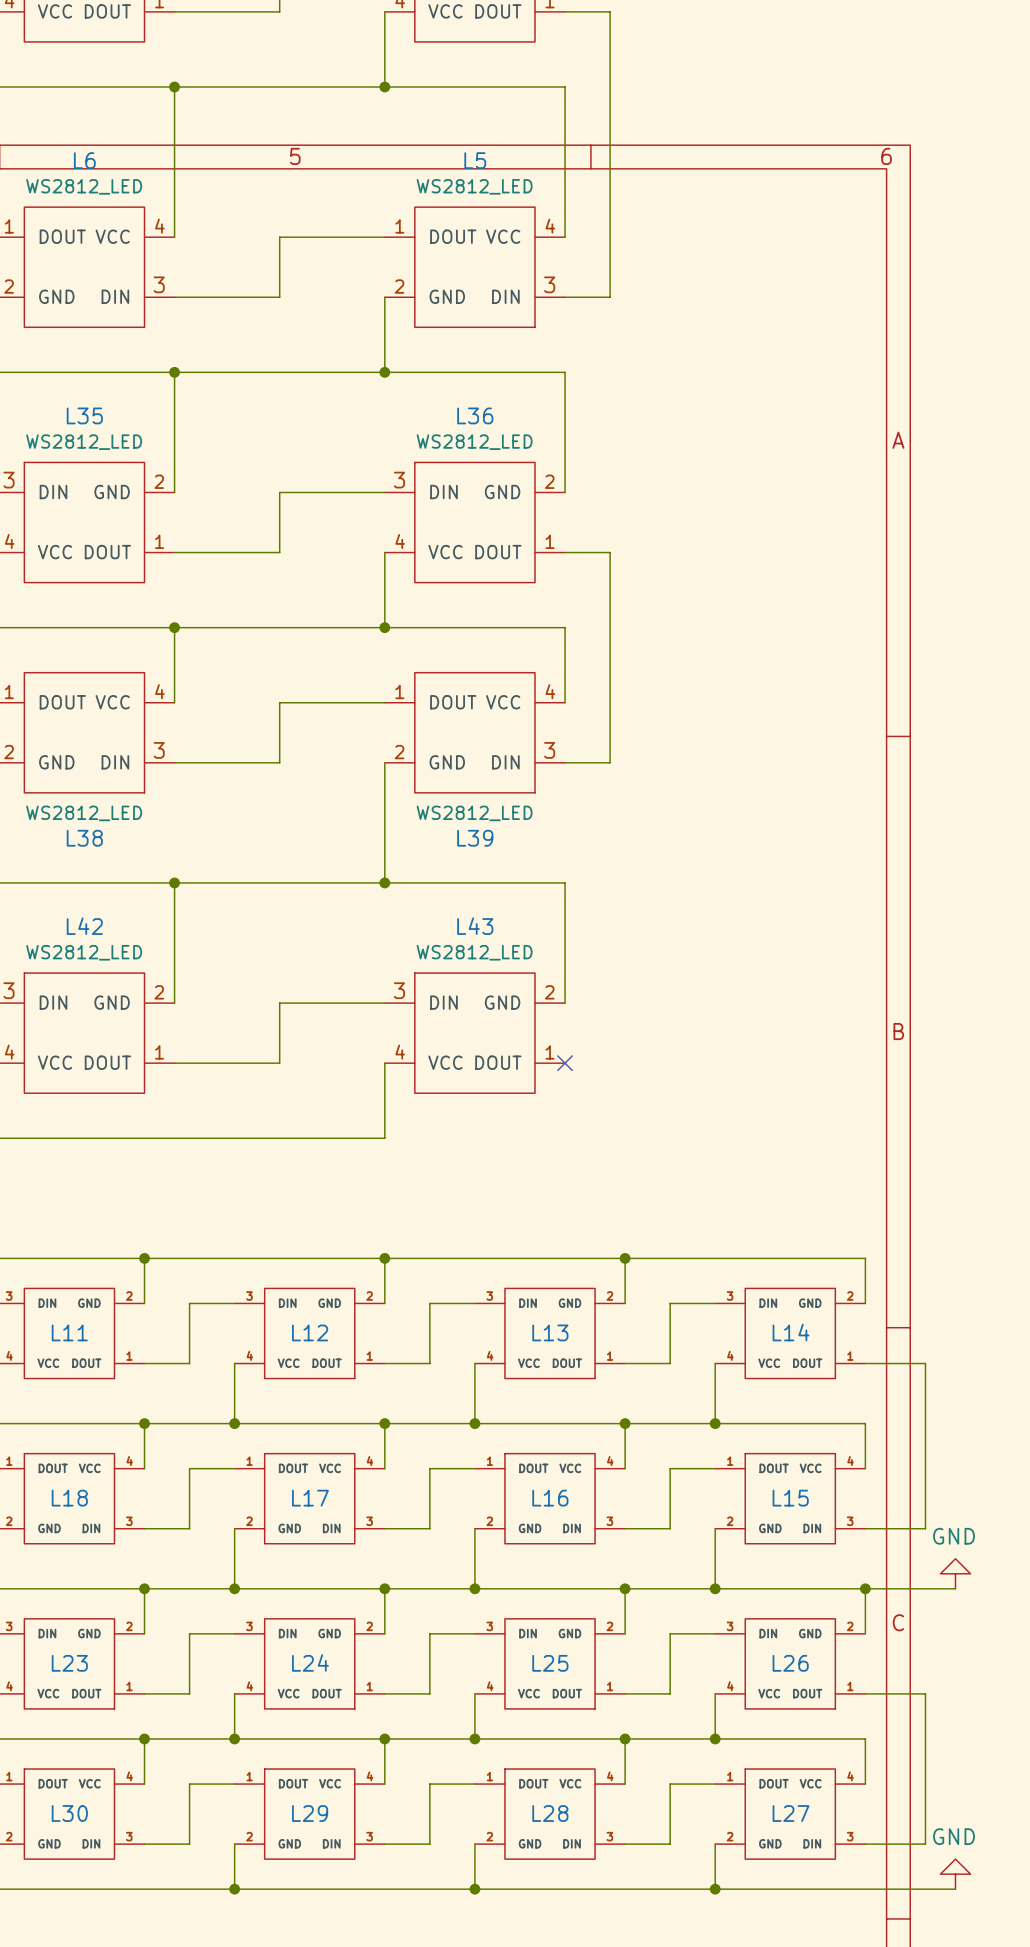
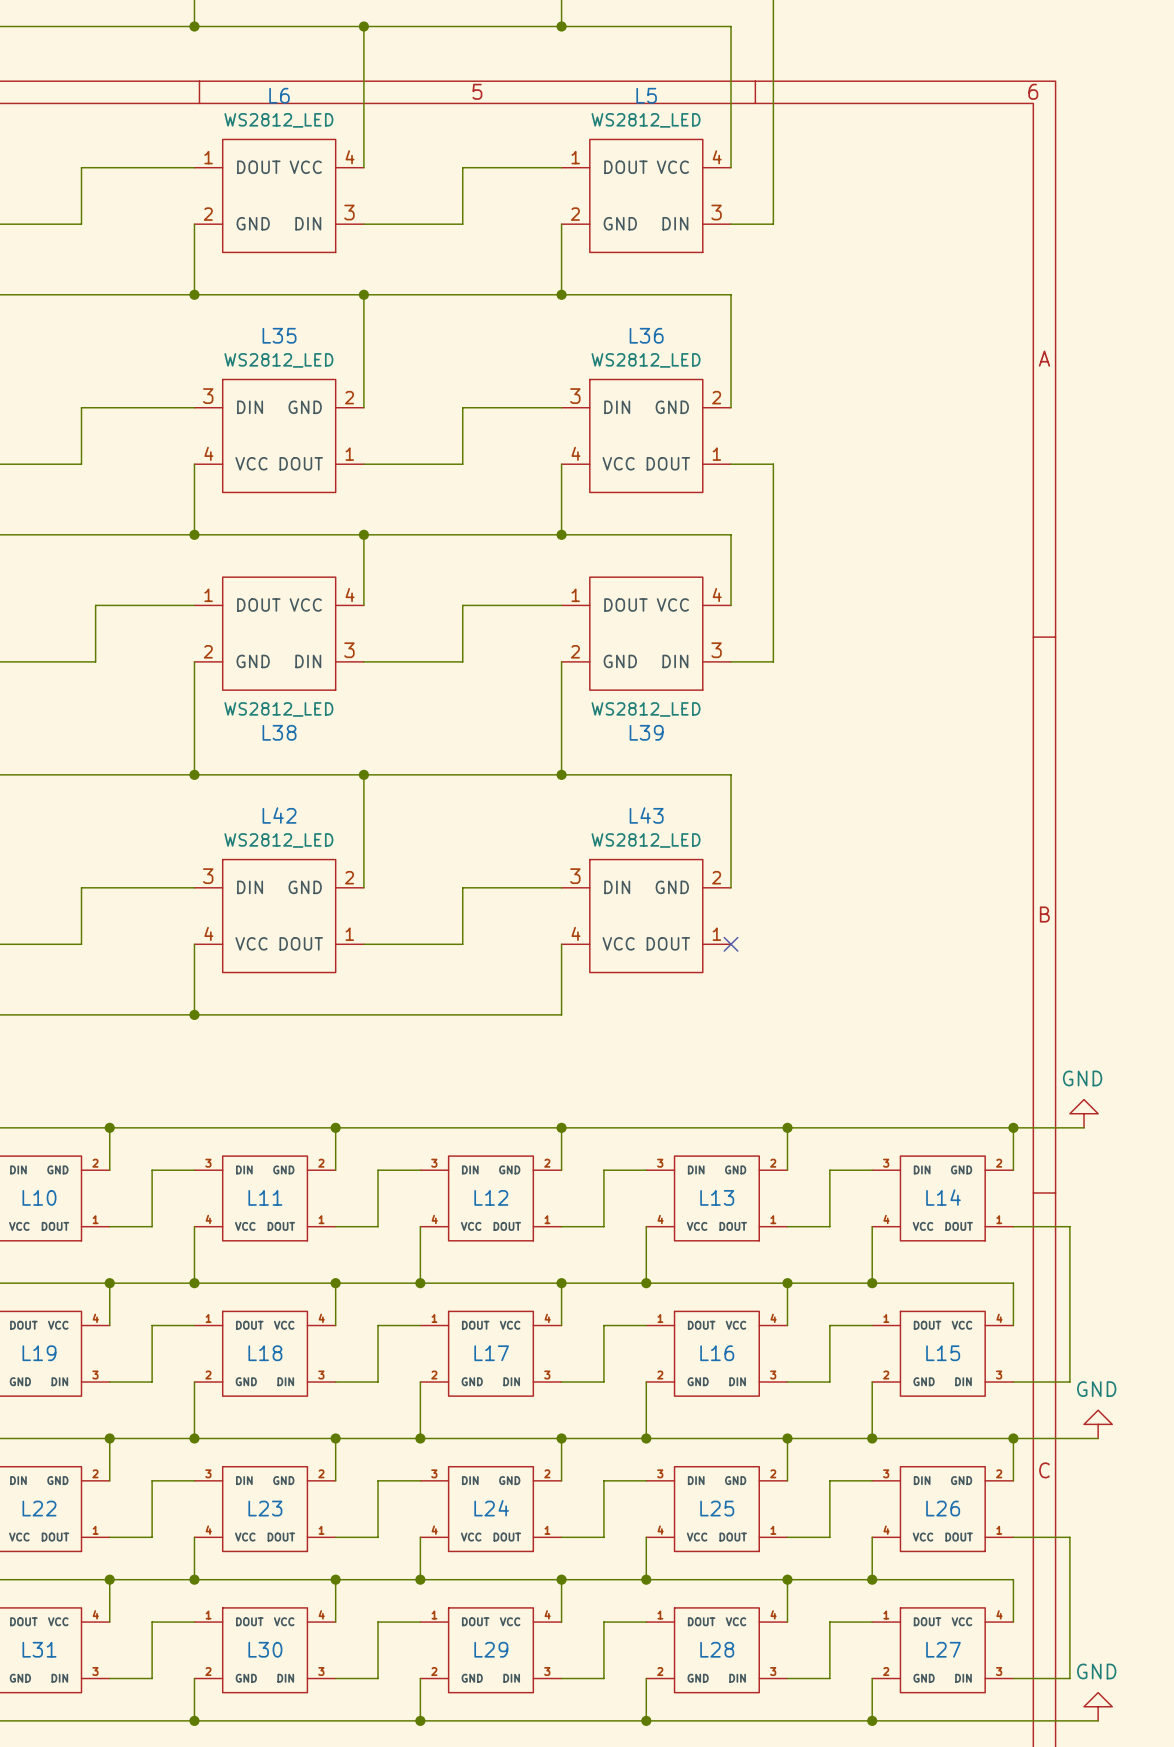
power symbol: none -> GND (1084, 1113)
wire: none -> (1013, 1127) (1084, 1127)
junction: none -> (1013, 1127)

